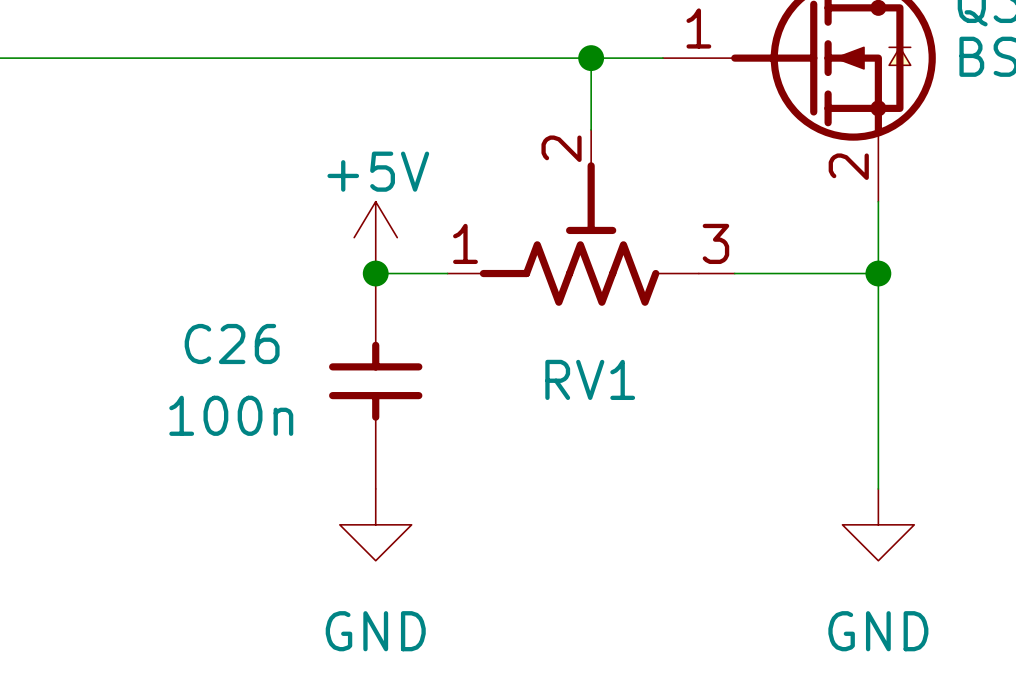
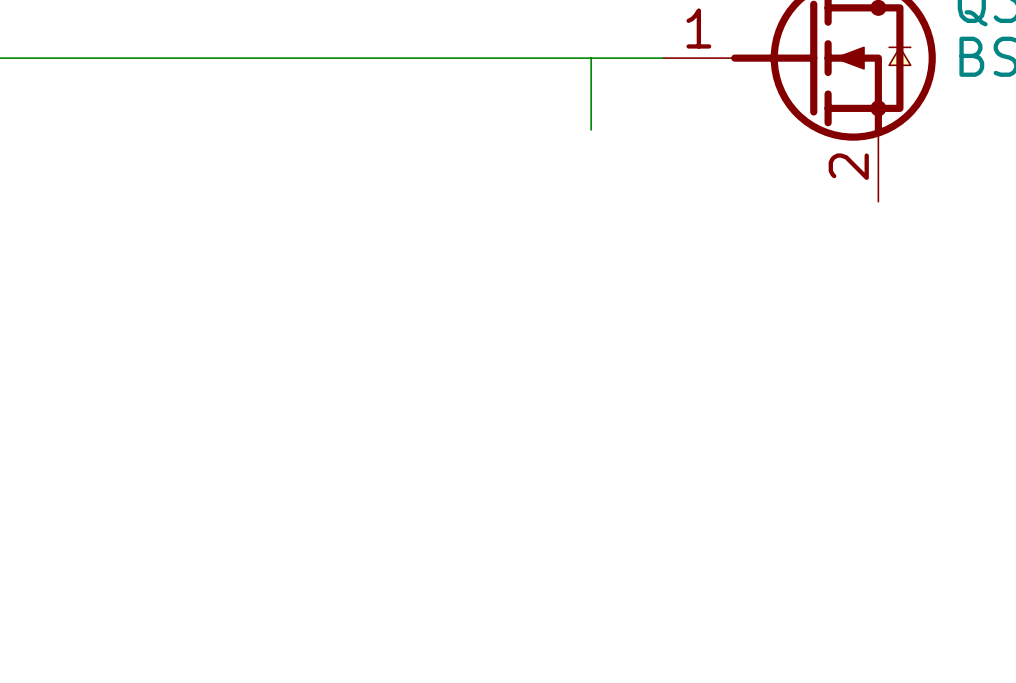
junction: (591, 58) -> none
wire: (878, 201) (878, 488) -> none
RV1: (591, 217) -> none
power symbol: +5V (375, 237) -> none
wire: (375, 273) (447, 273) -> none
junction: (375, 273) -> none
wire: (734, 273) (878, 273) -> none
junction: (878, 273) -> none
C26: 100n (375, 381) -> none
power symbol: GND (375, 524) -> none
power symbol: GND (878, 524) -> none

